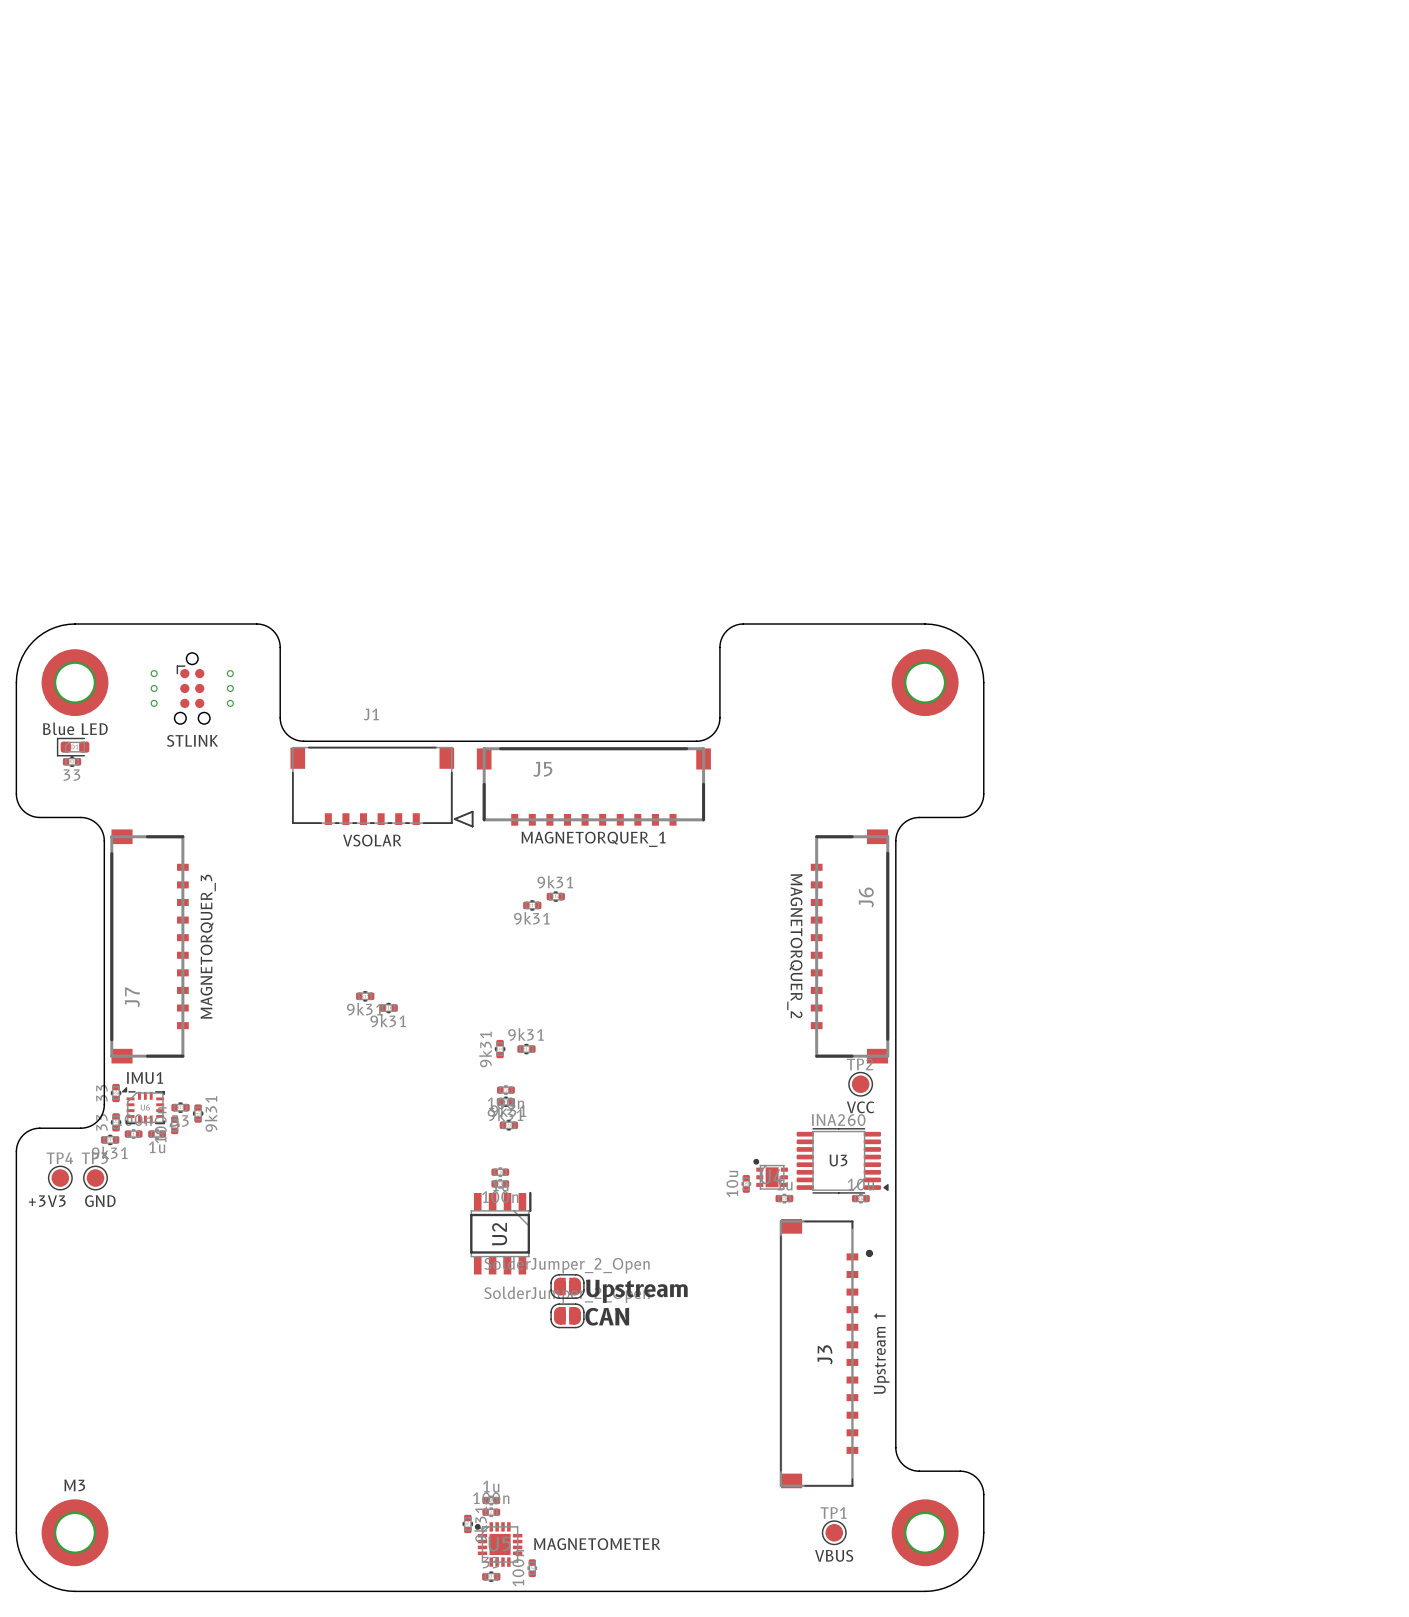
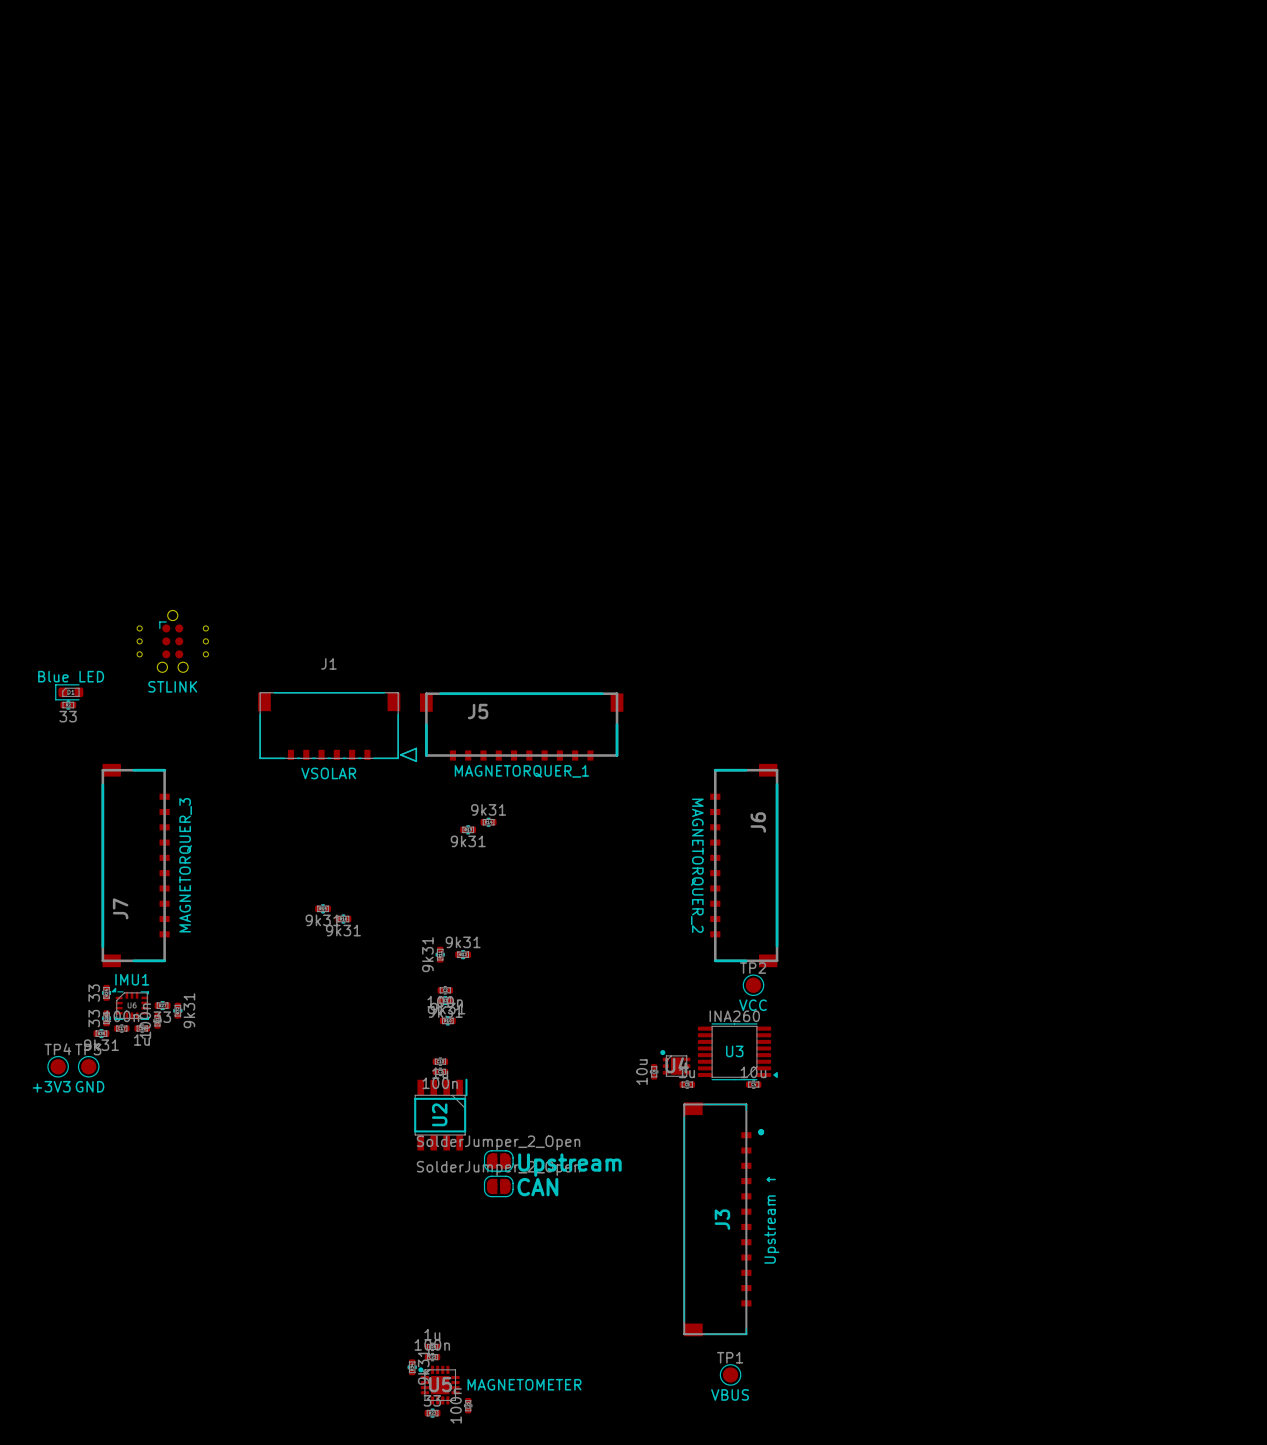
part: (500, 1107) -> none

